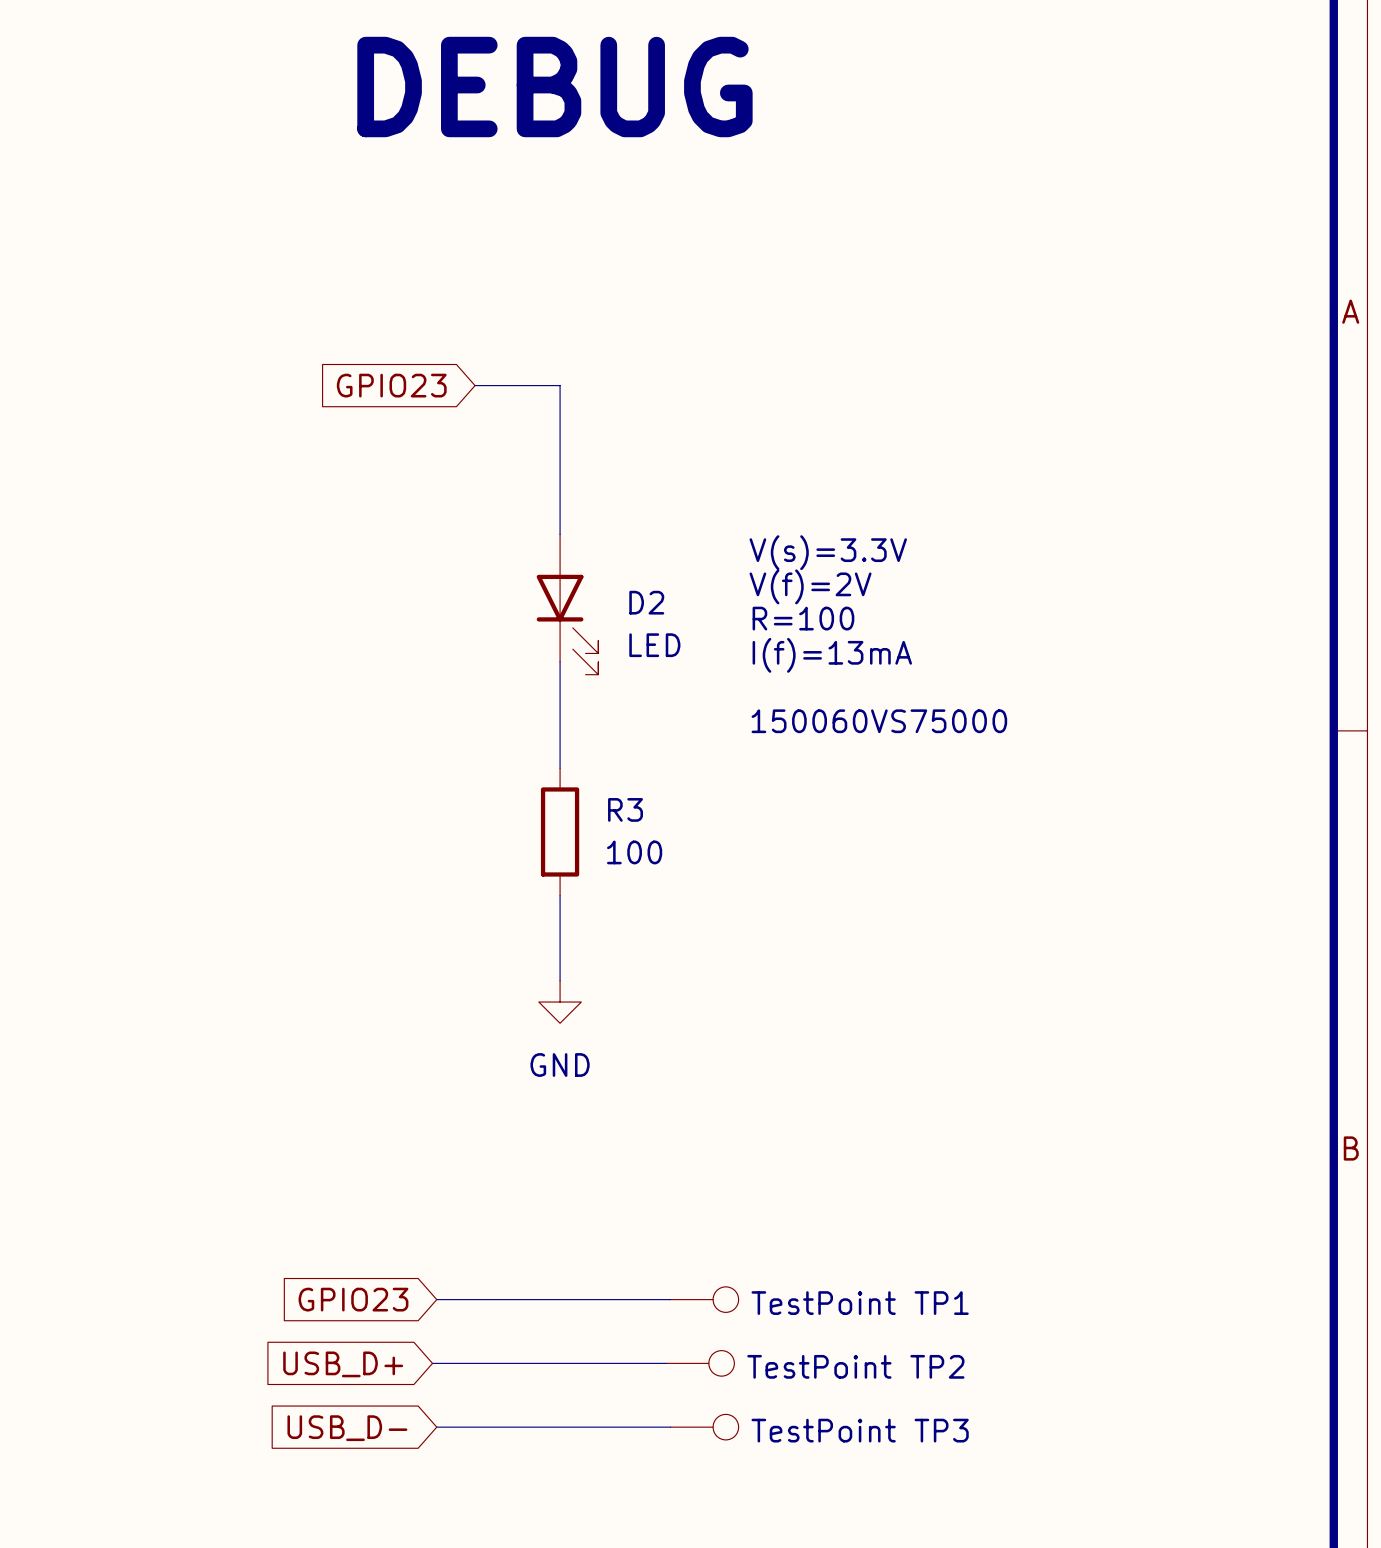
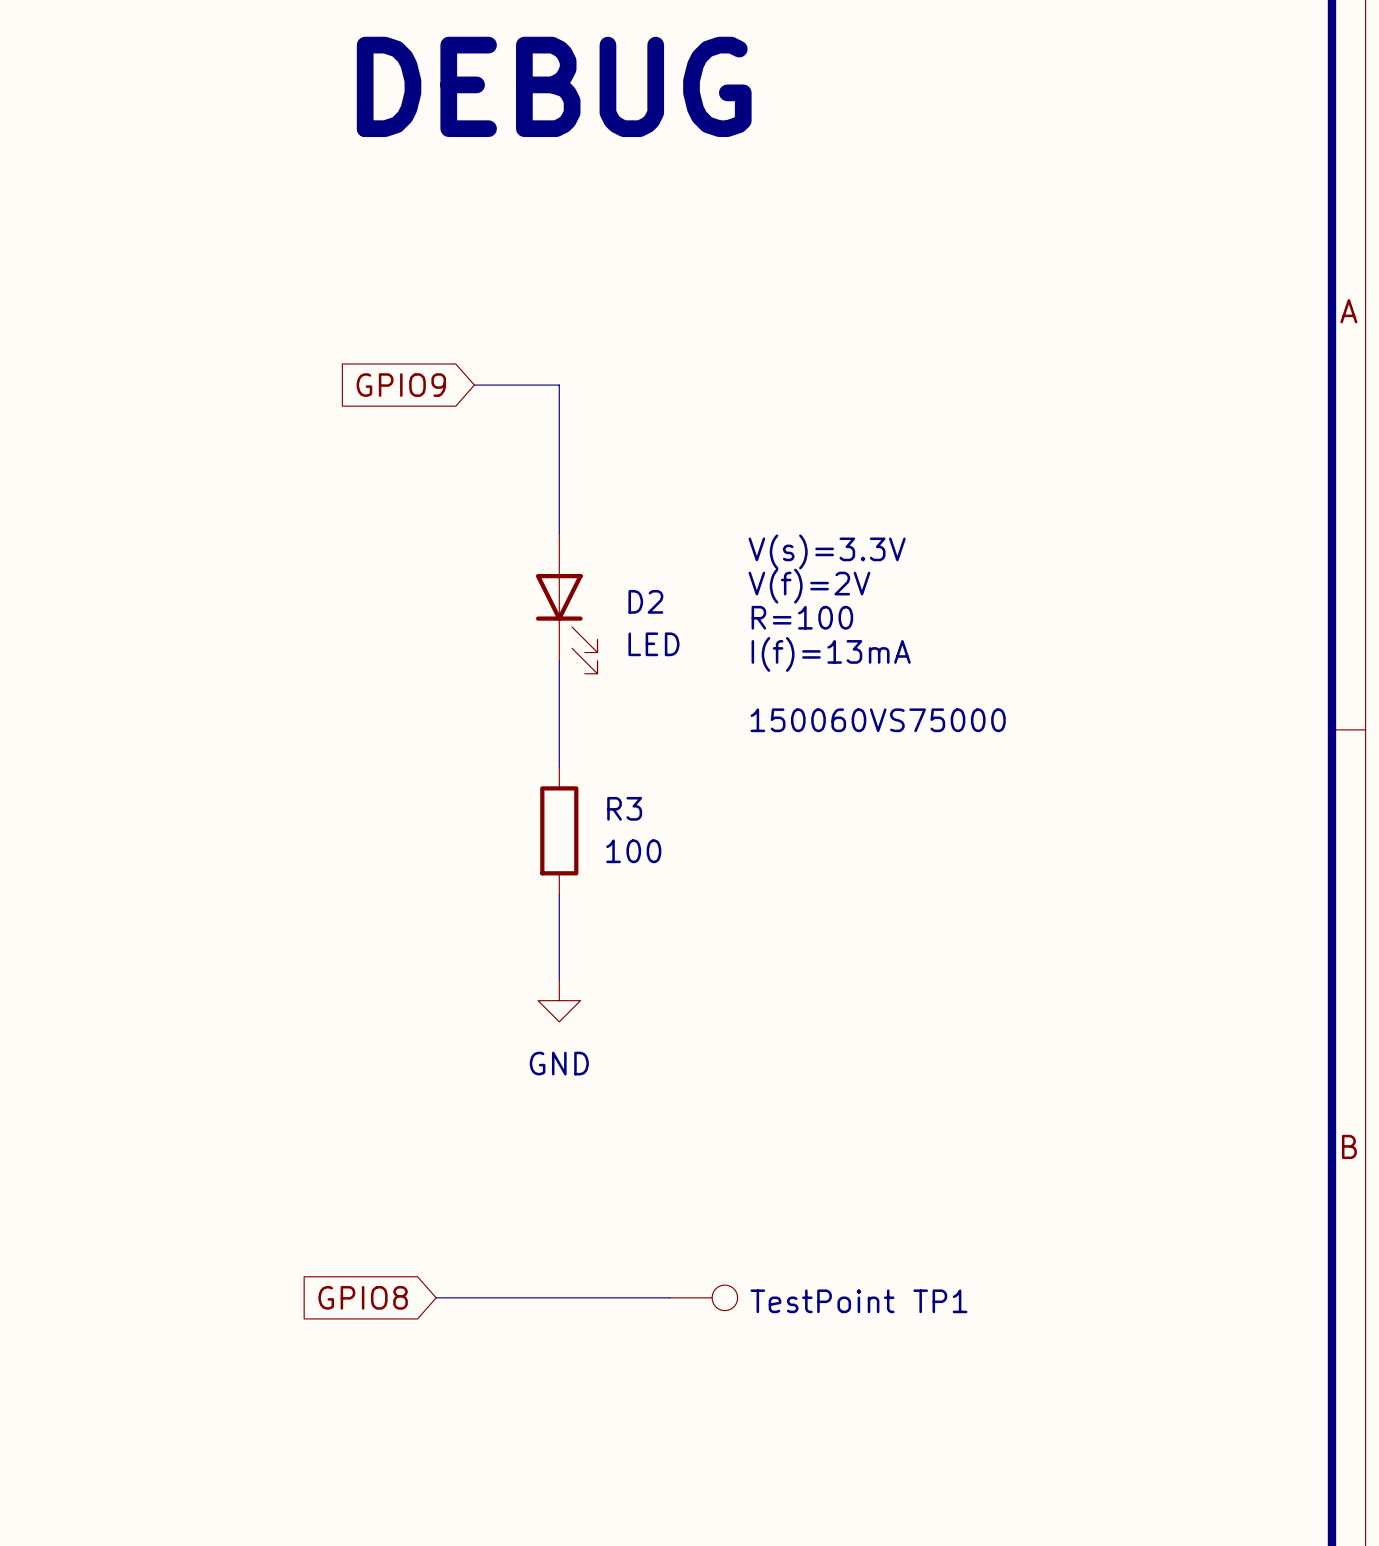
global label: GPIO23 (391, 385) -> GPIO9 (401, 385)
global label: GPIO23 (353, 1299) -> GPIO8 (363, 1297)
wire: (432, 1363) (666, 1363) -> none
TP2: TestPoint (700, 1363) -> none
global label: USB_D+ (343, 1364) -> none
wire: (436, 1427) (670, 1427) -> none
TP3: TestPoint (704, 1427) -> none
global label: USB_D- (347, 1428) -> none

